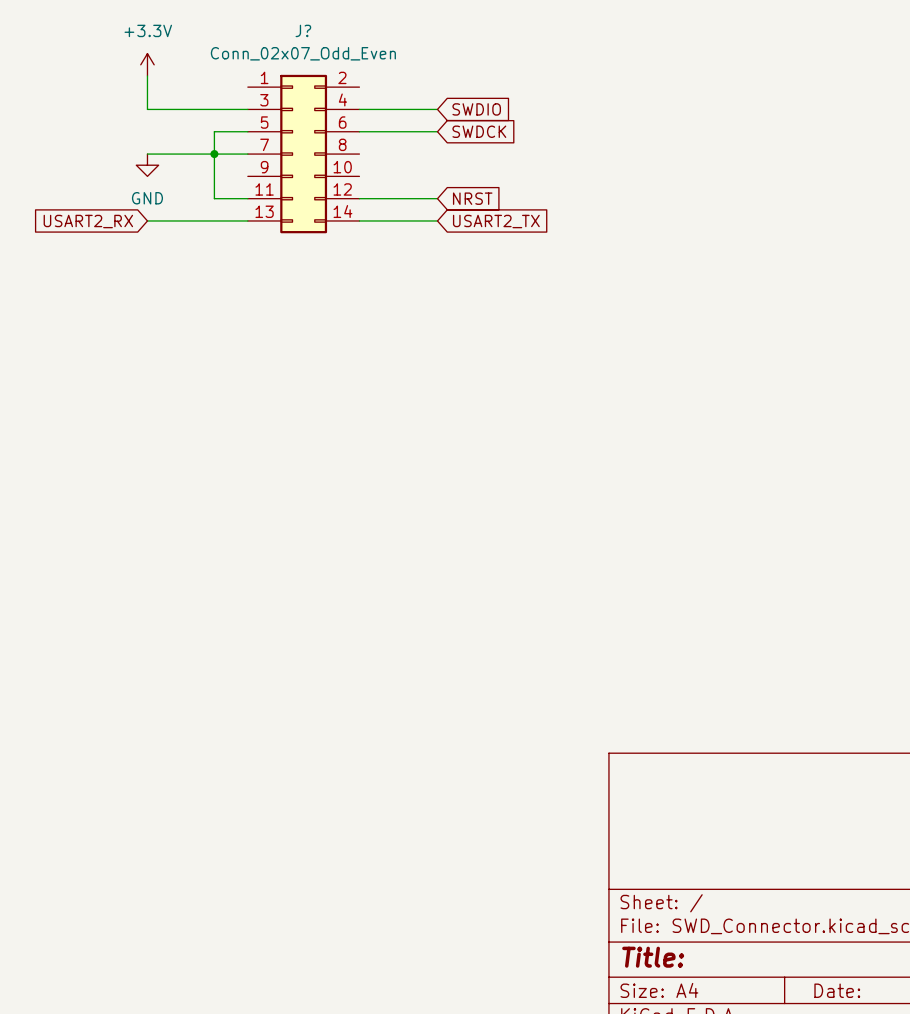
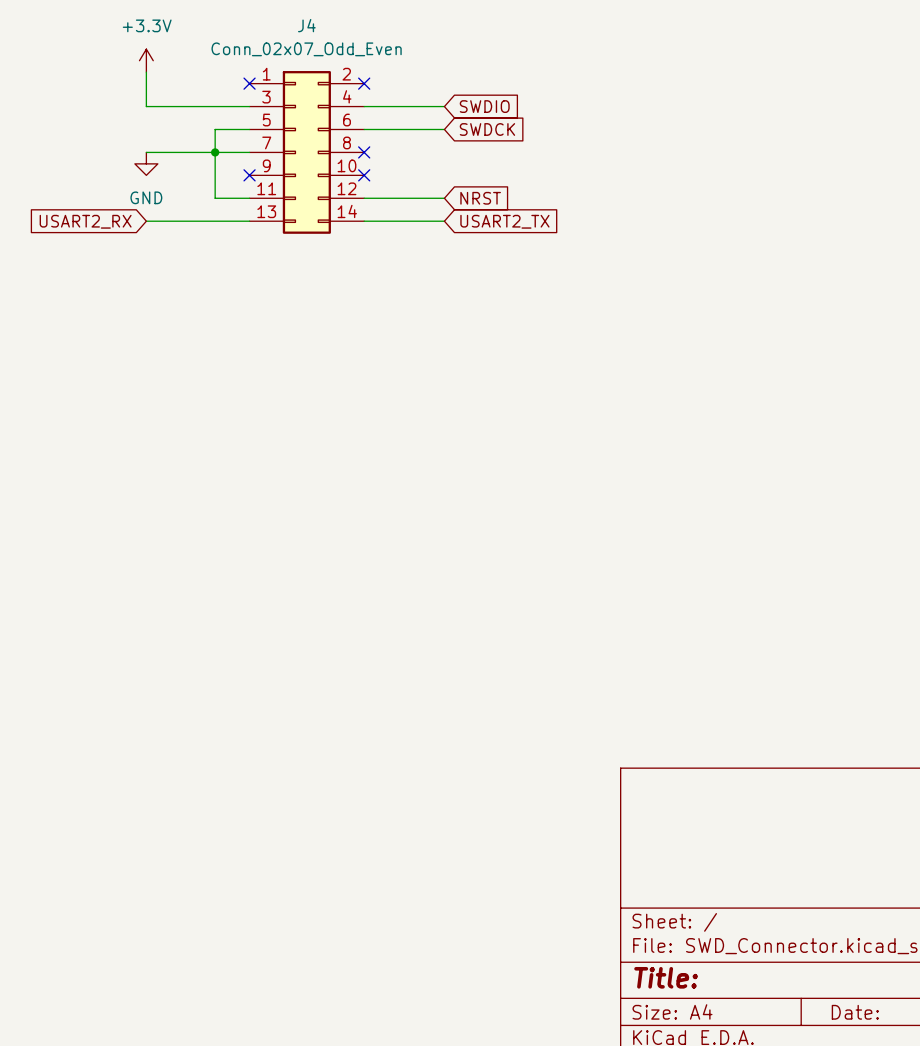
J? name: J? (303, 30) -> J4 (306, 25)
no-connect mark: none -> (249, 83)
no-connect mark: none -> (364, 83)
no-connect mark: none -> (364, 152)
no-connect mark: none -> (249, 175)
no-connect mark: none -> (364, 175)

